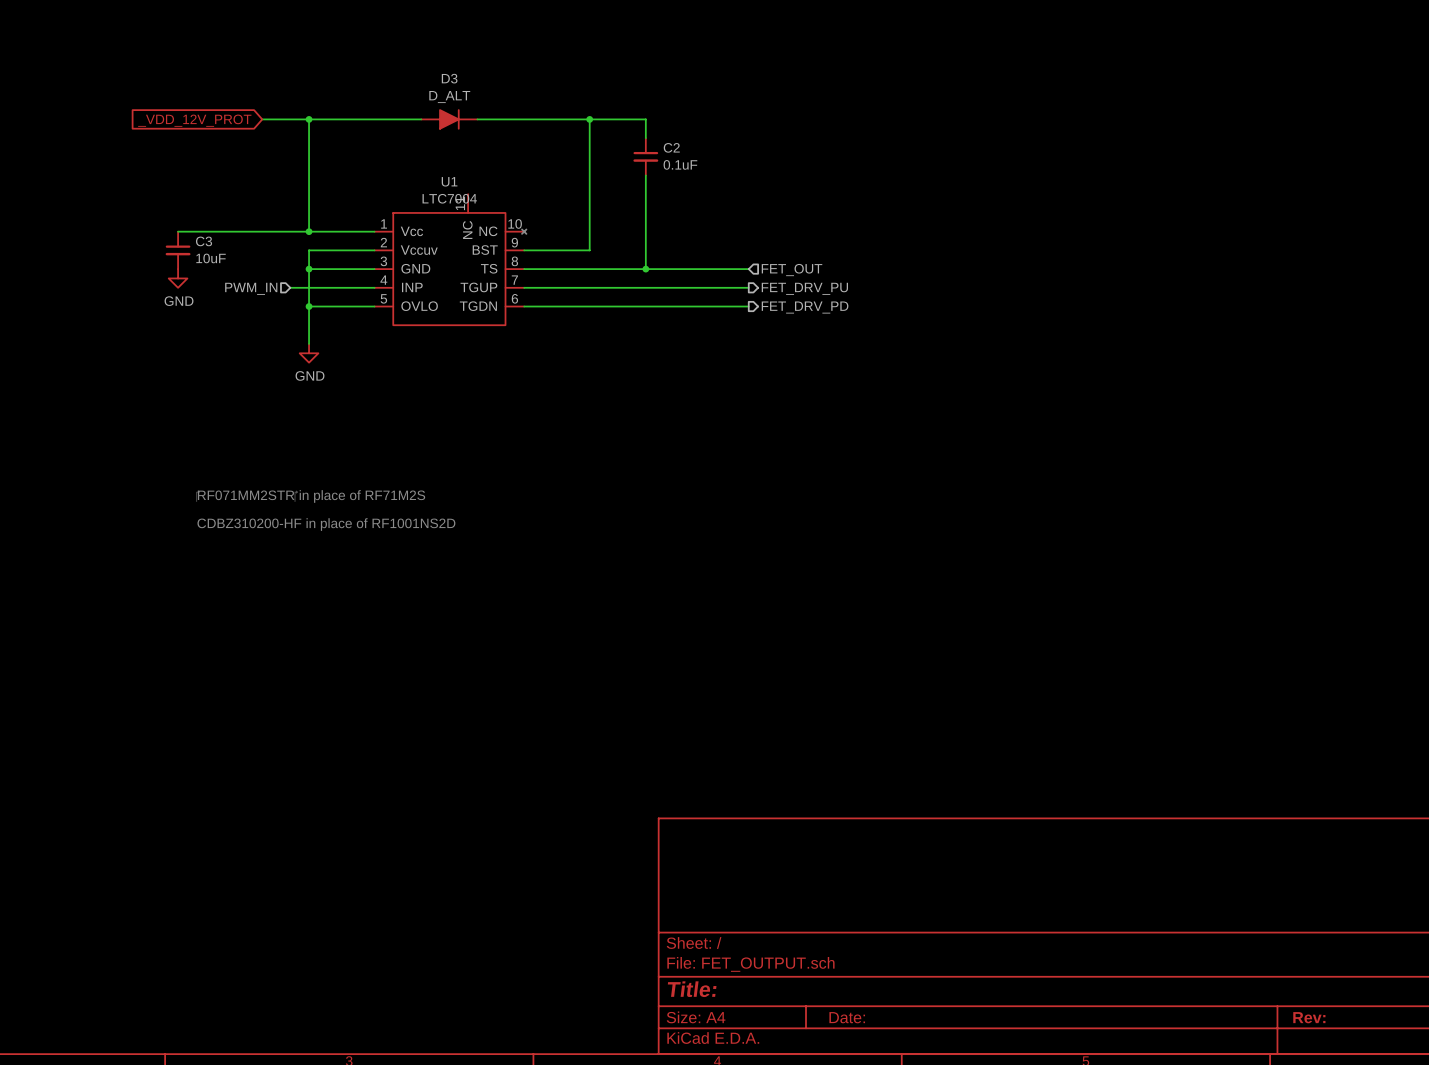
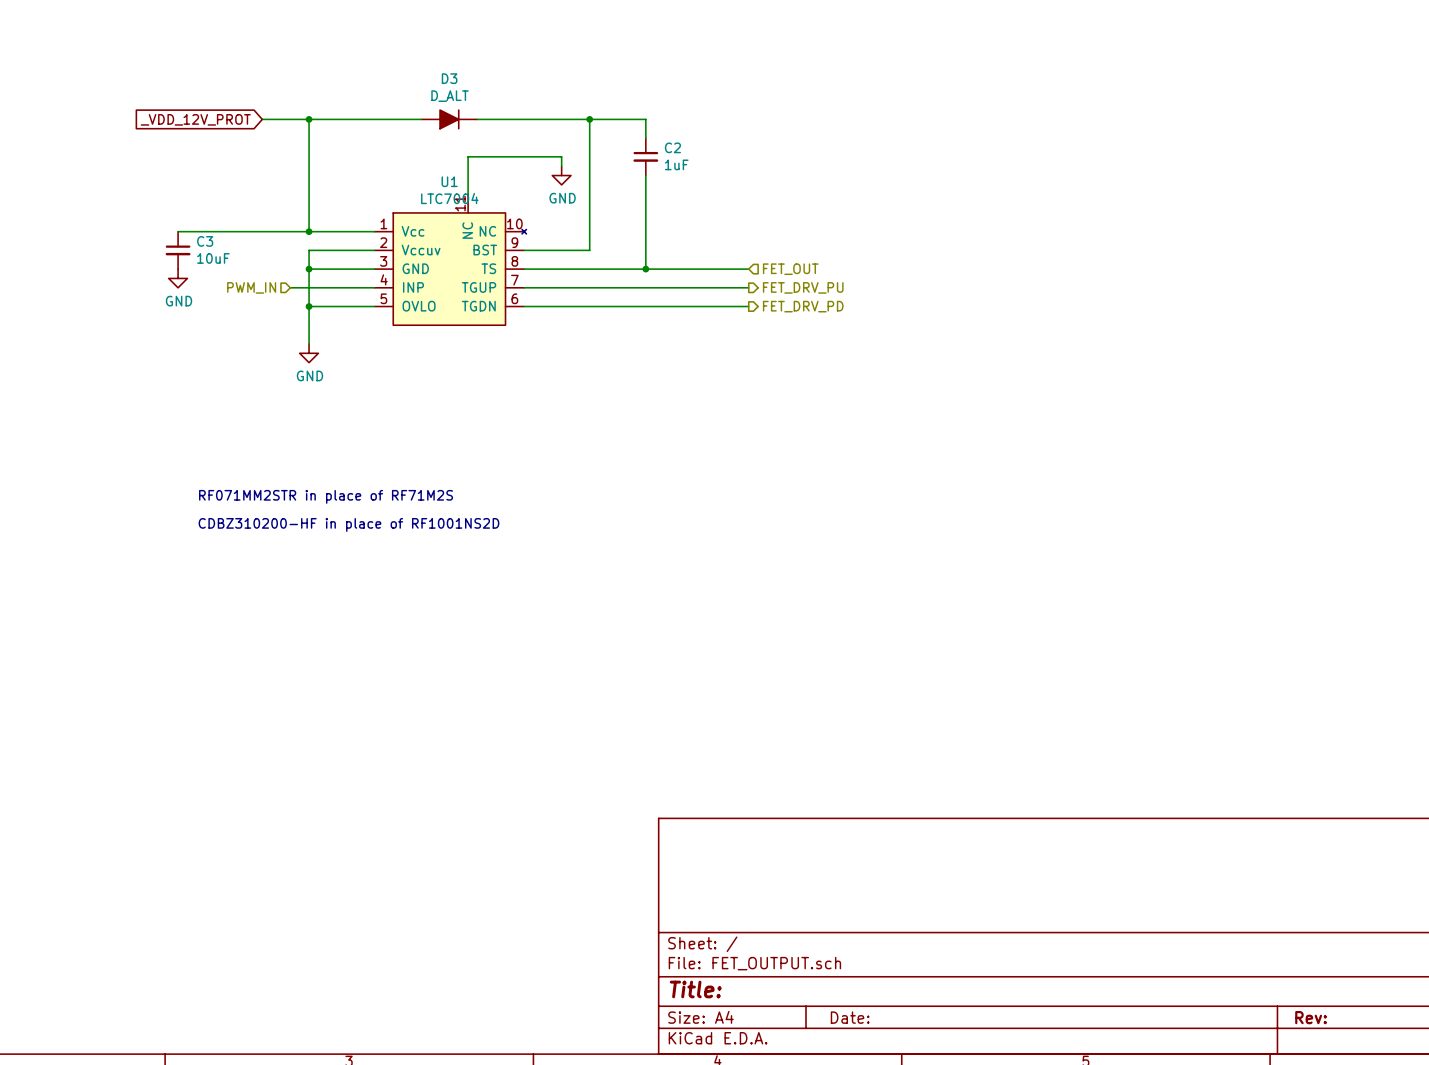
C2 value: 0.1uF (680, 164) -> 1uF (676, 164)
wire: none -> (561, 166) (561, 156) (468, 156) (468, 194)
power symbol: none -> GND (561, 175)

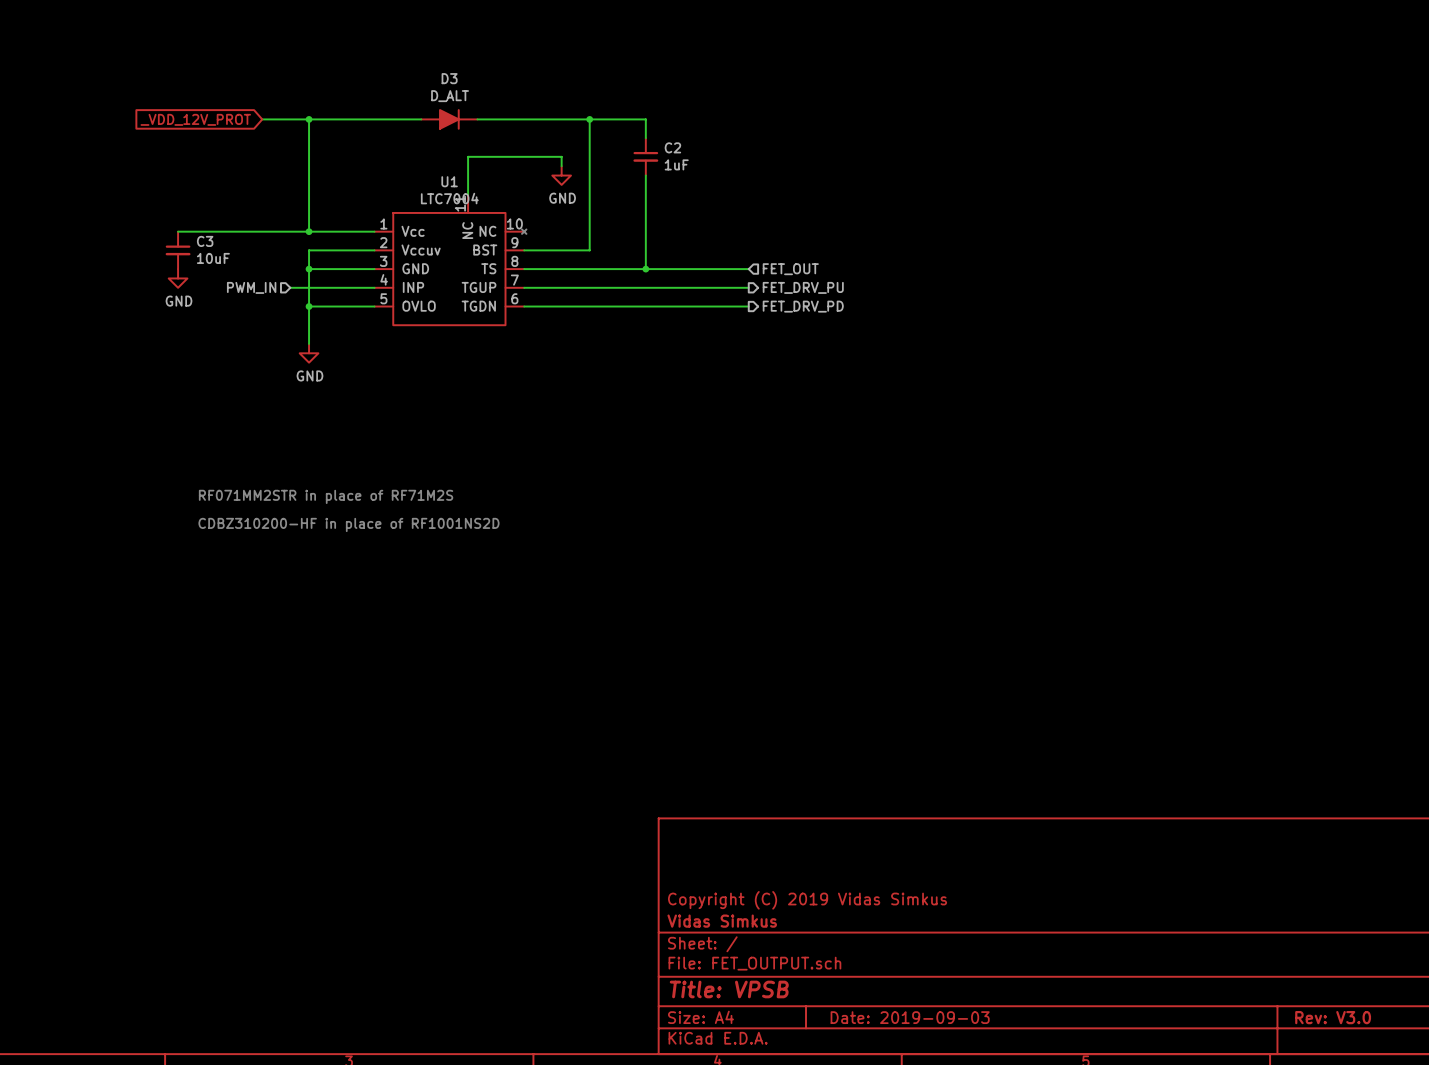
title block: none -> Copyright (C) 2019 Vidas Simkus (807, 900)
title block: none -> Vidas Simkus (722, 921)
title block: Title: (695, 989) -> Title: VPSB (729, 989)
title block: Date: (850, 1017) -> Date: 2019-09-03 (910, 1017)
title block: Rev: (1311, 1017) -> Rev: V3.0 (1333, 1017)

